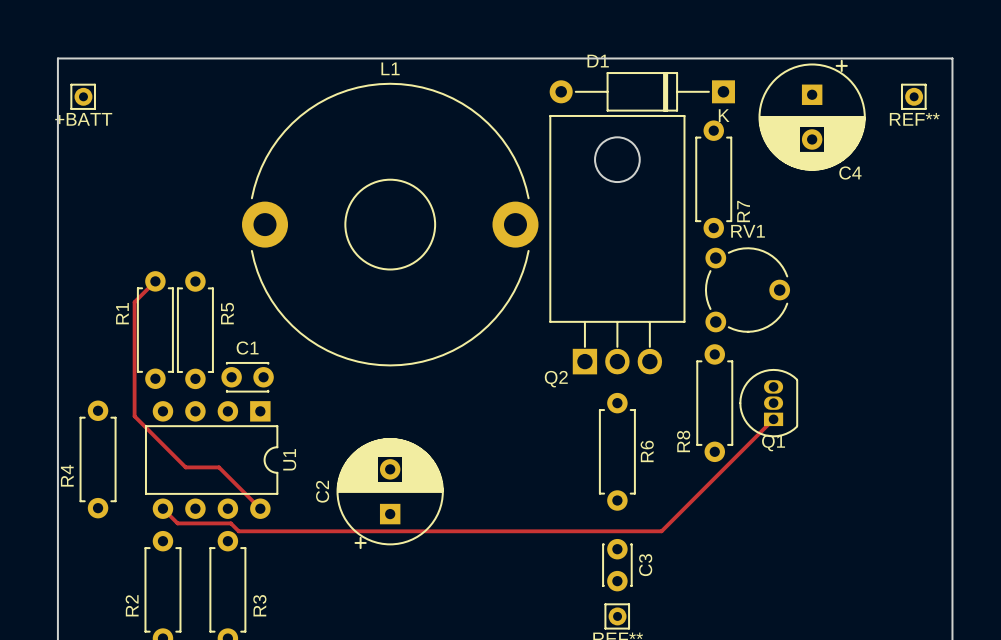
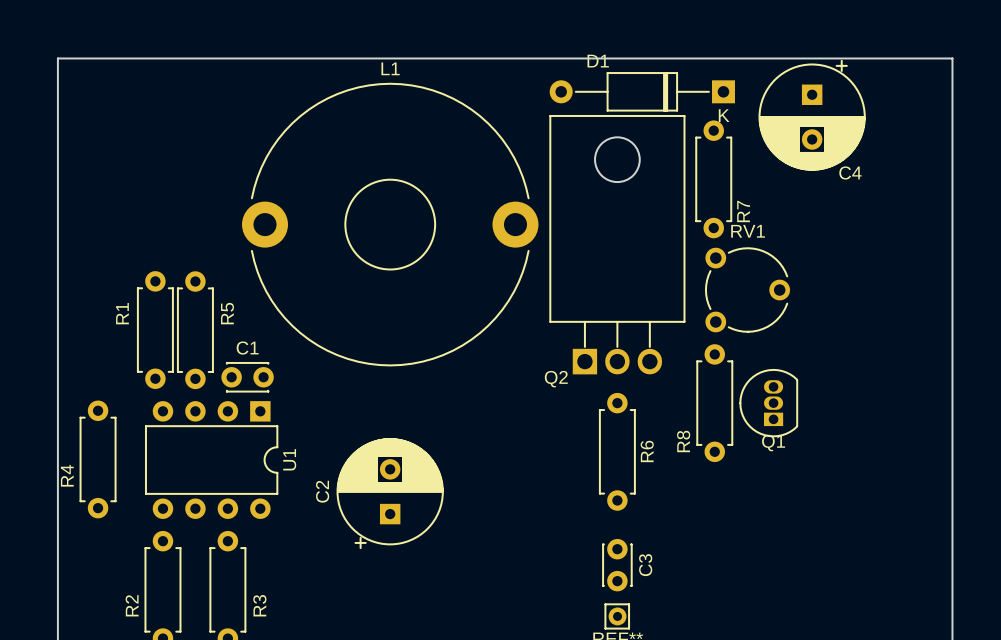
+BATT: (83, 96) -> none
REF**: (913, 96) -> none
track: (155, 281) (134, 302) (134, 416) (185, 467) (219, 467) (265, 514) -> none
track: (773, 419) (661, 531) (238, 531) (230, 523) (177, 523) (162, 508) -> none

